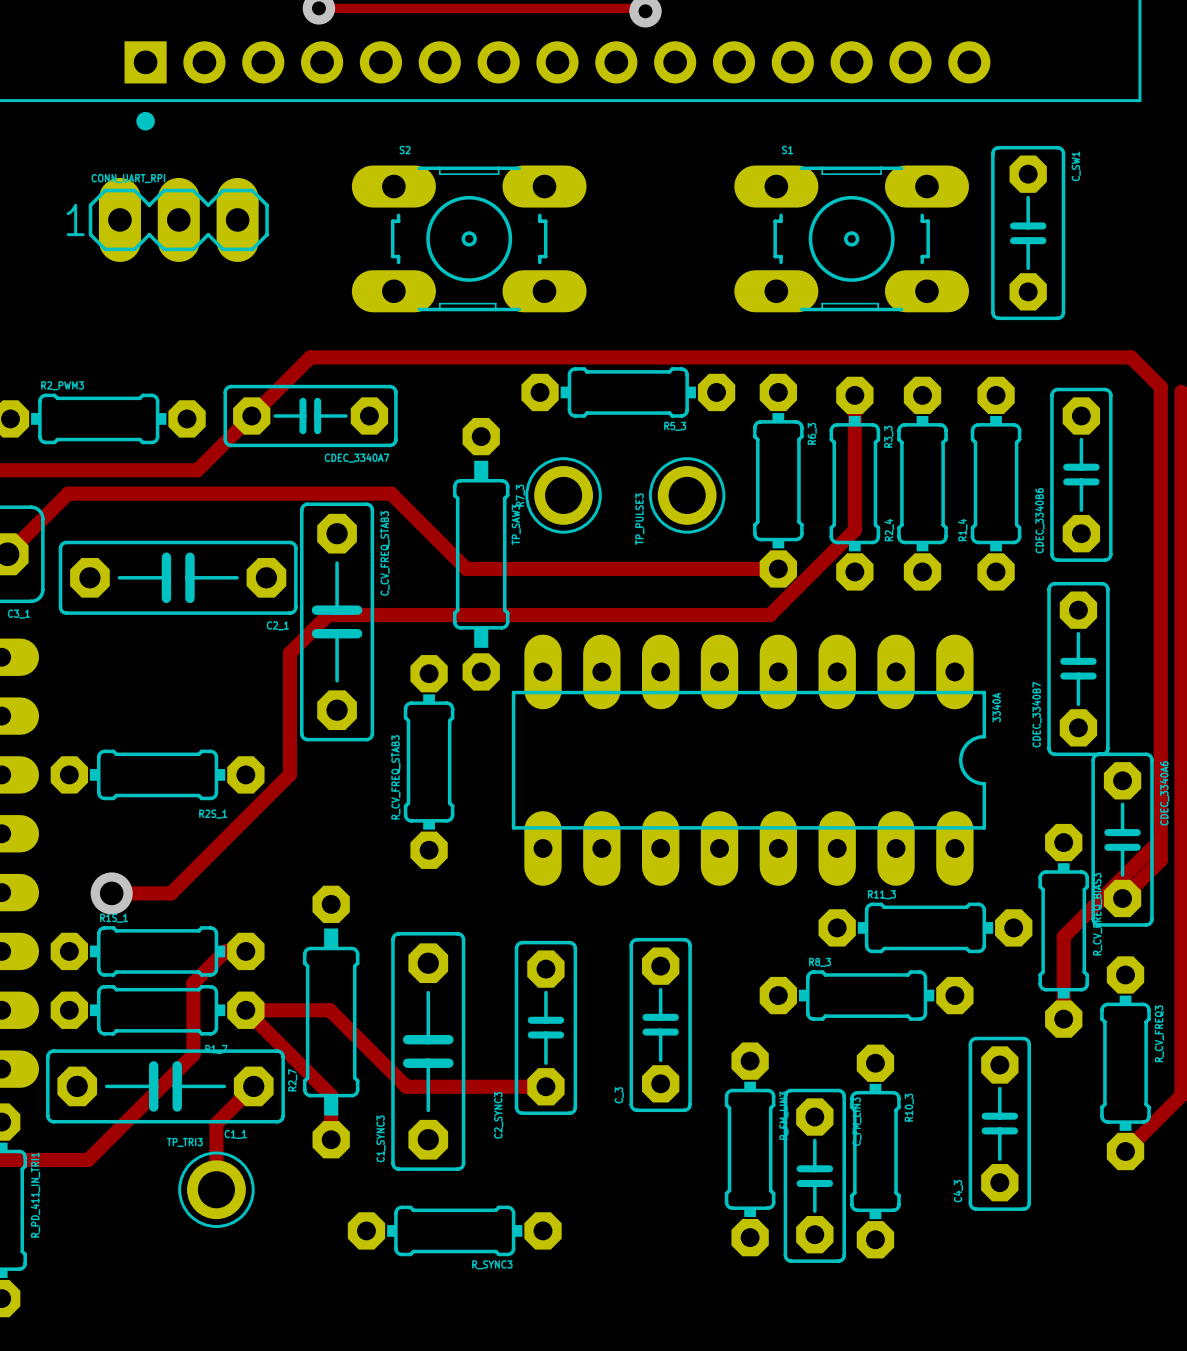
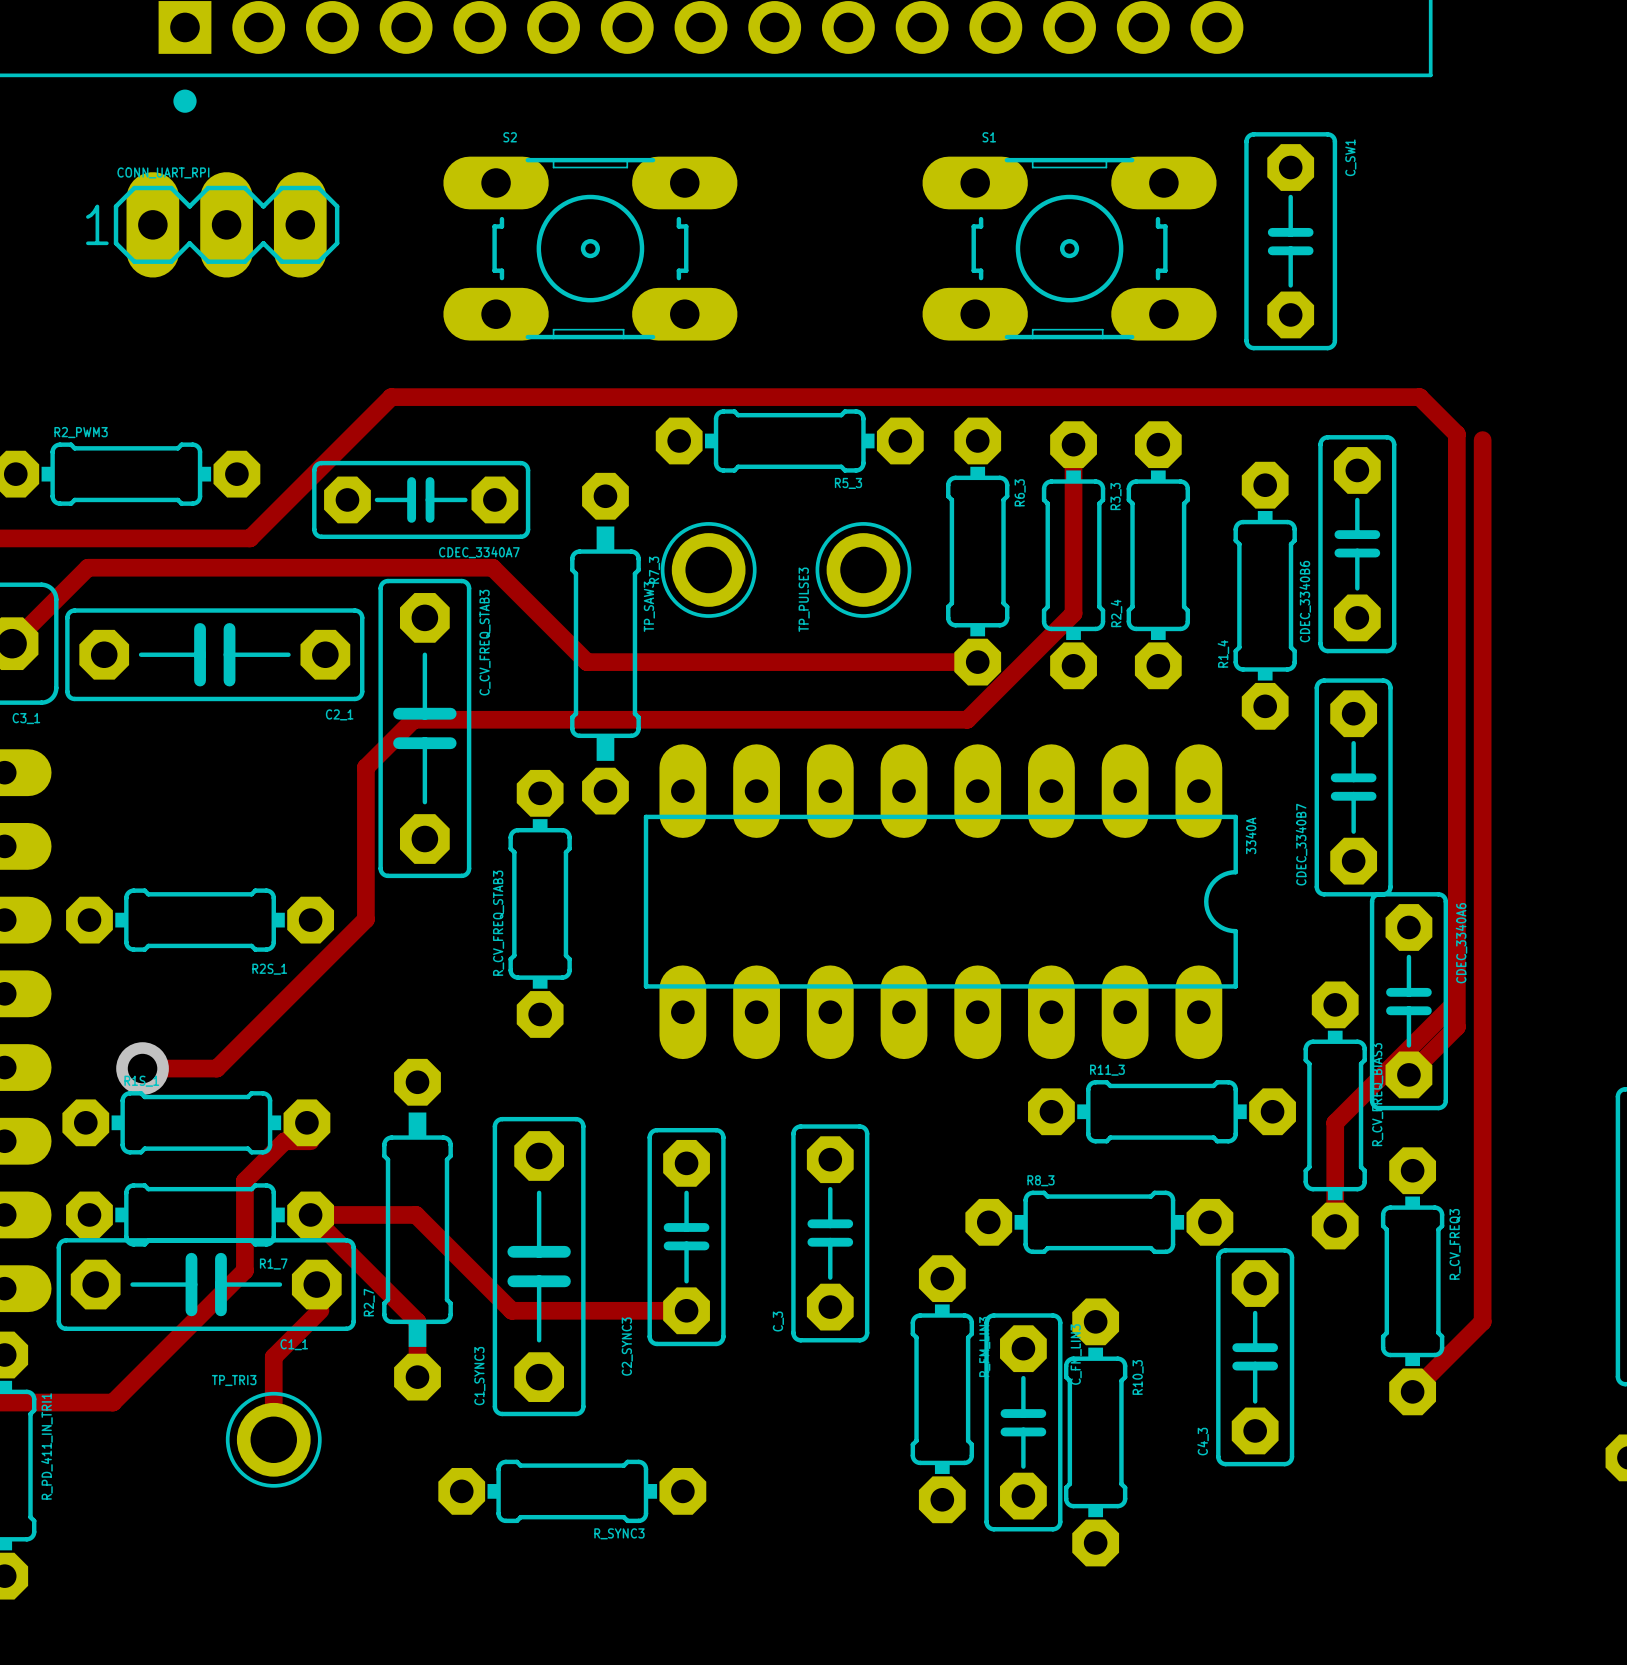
CDEC_3340A7 position: (310, 416) -> (421, 499)
R1_4 position: (996, 483) -> (1265, 595)
C2_1 position: (178, 577) -> (214, 654)
R1S_1 position: (157, 951) -> (196, 1122)
R8_3 position: (866, 995) -> (1099, 1222)
C1_1 position: (165, 1086) -> (206, 1284)
R10_3 position: (875, 1151) -> (1095, 1432)

